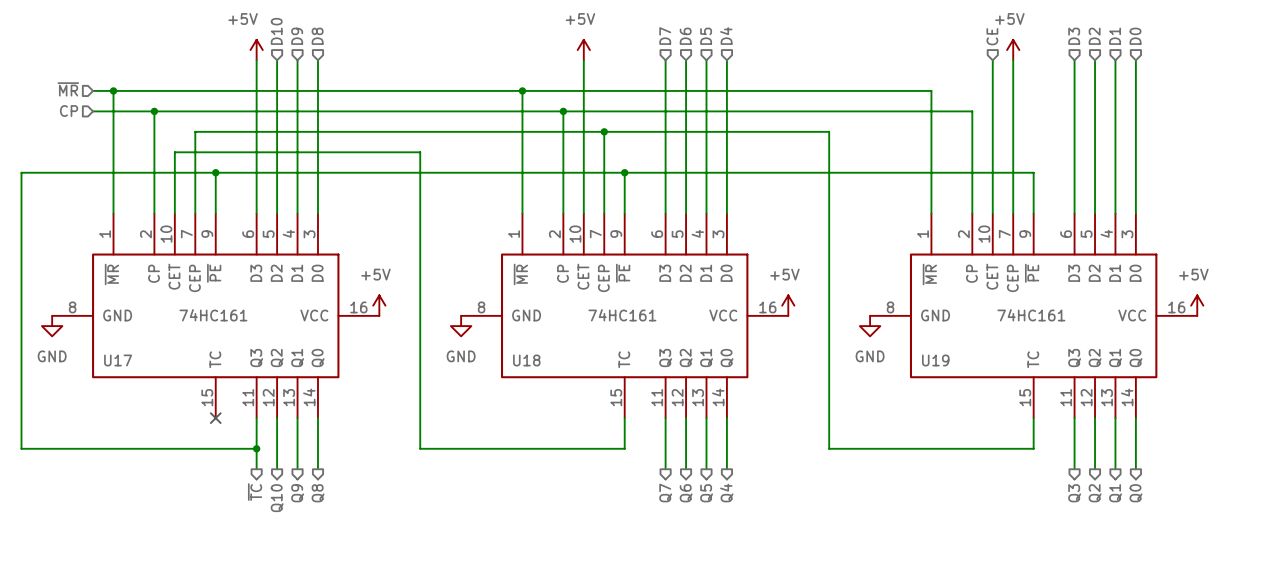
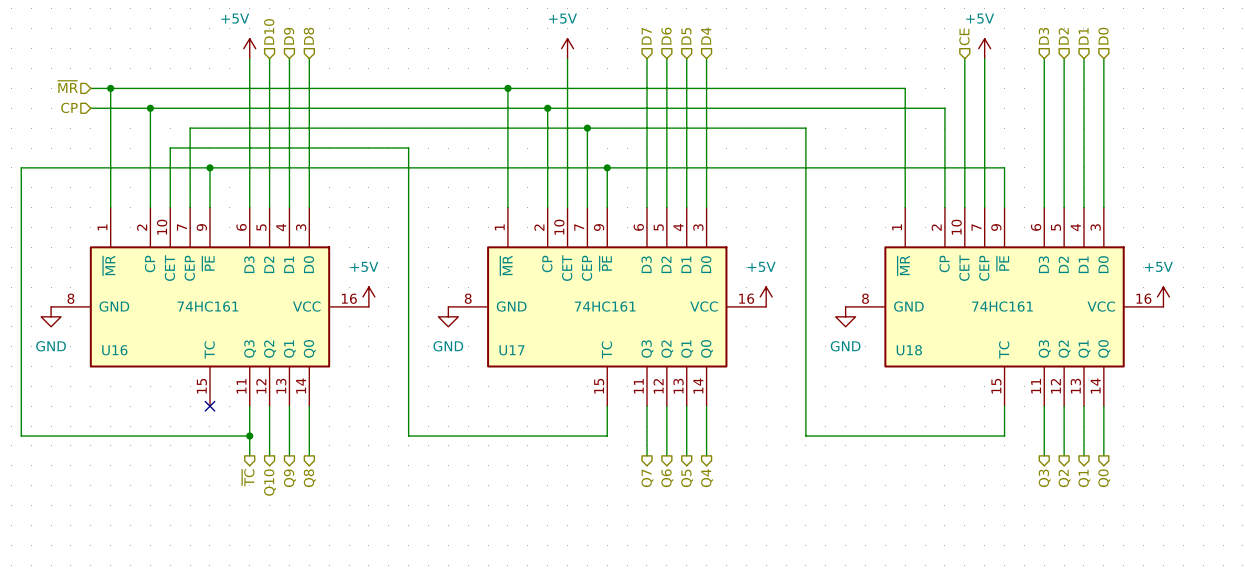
U17 name: U17 (118, 360) -> U16 (114, 350)
U18 name: U18 (526, 360) -> U17 (511, 350)
U19 name: U19 (935, 360) -> U18 (909, 350)

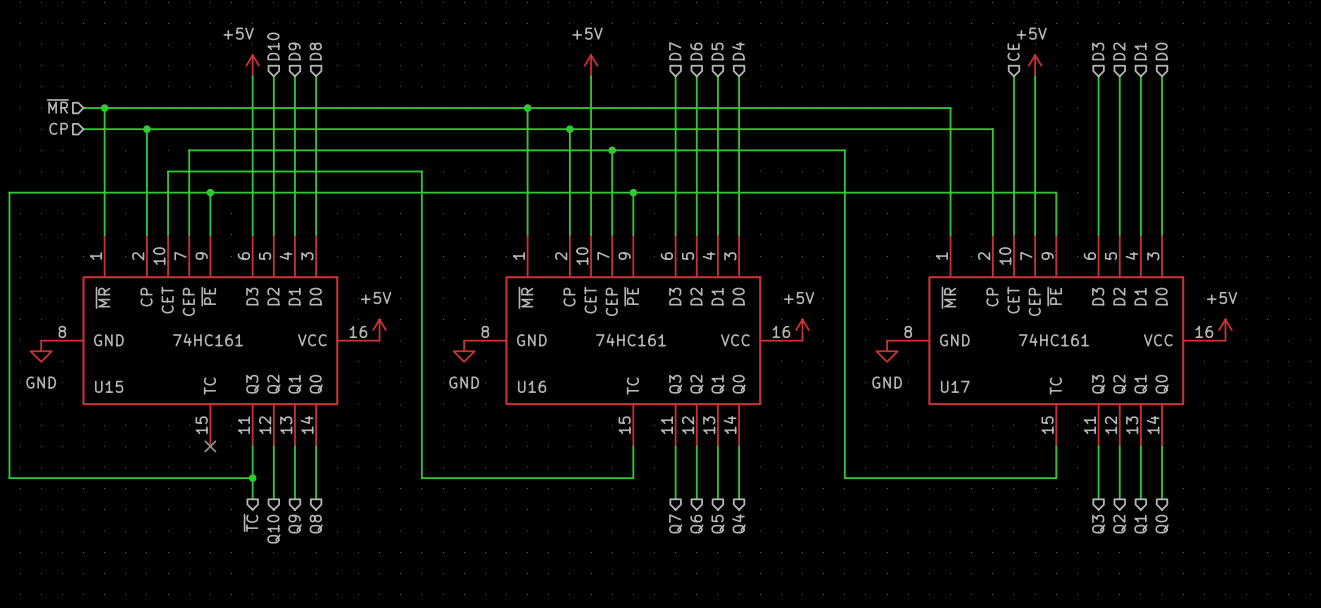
U16 name: U16 (114, 350) -> U15 (109, 386)
U17 name: U17 (511, 350) -> U16 (532, 386)
U18 name: U18 (909, 350) -> U17 (955, 386)

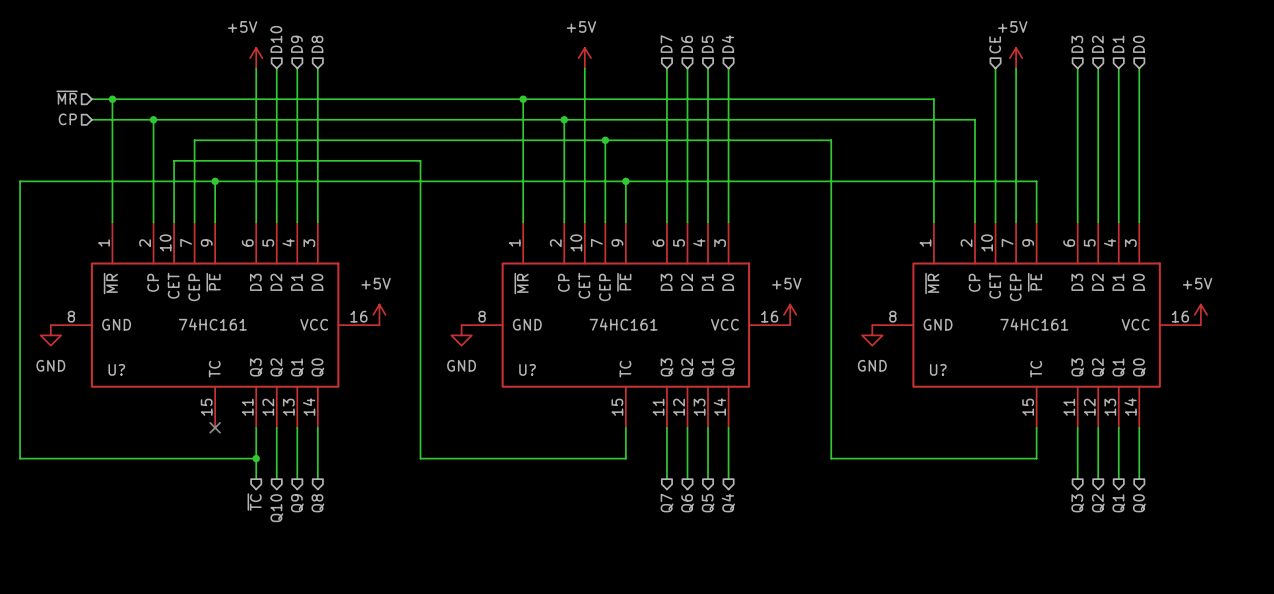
U15 name: U15 (109, 386) -> U? (116, 369)
U16 name: U16 (532, 386) -> U? (527, 369)
U17 name: U17 (955, 386) -> U? (938, 369)

